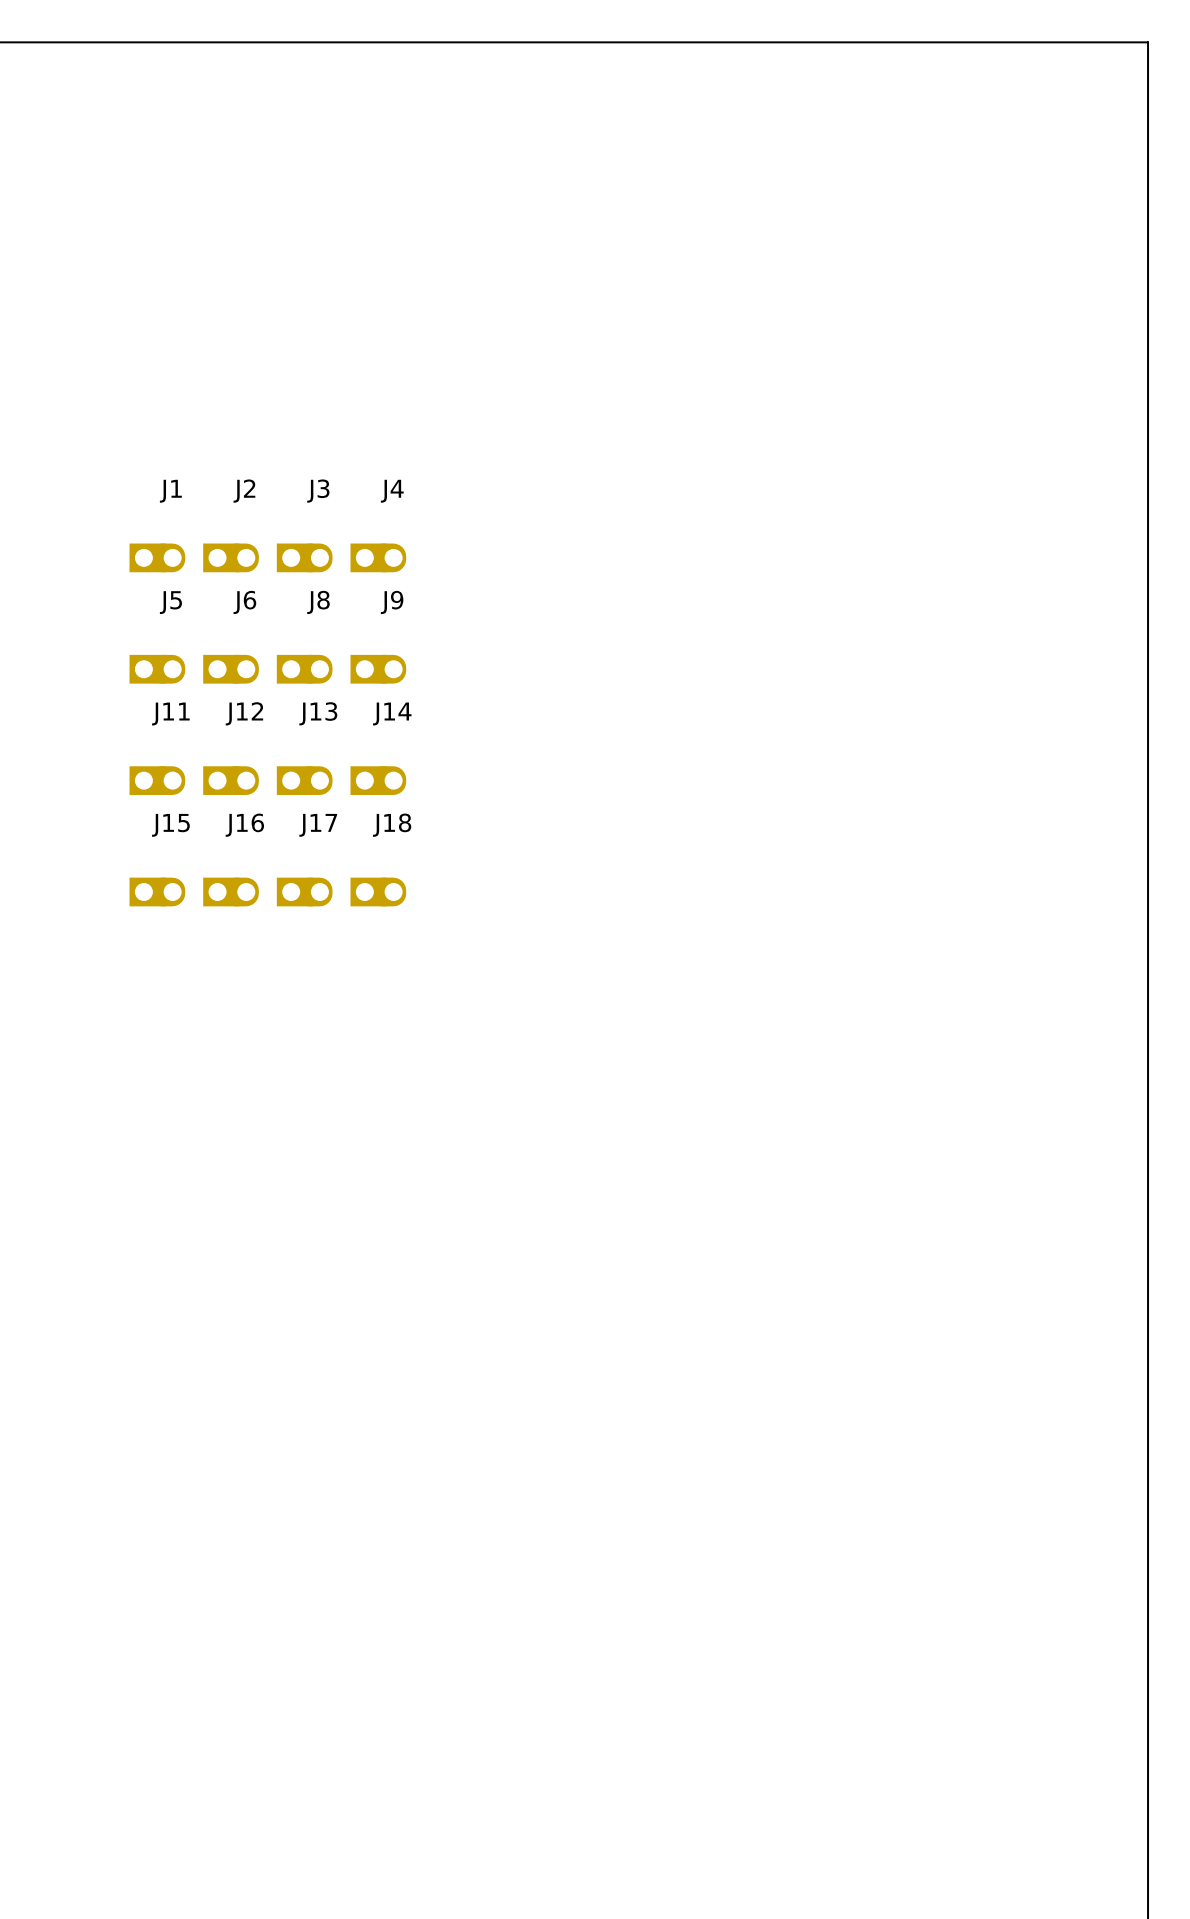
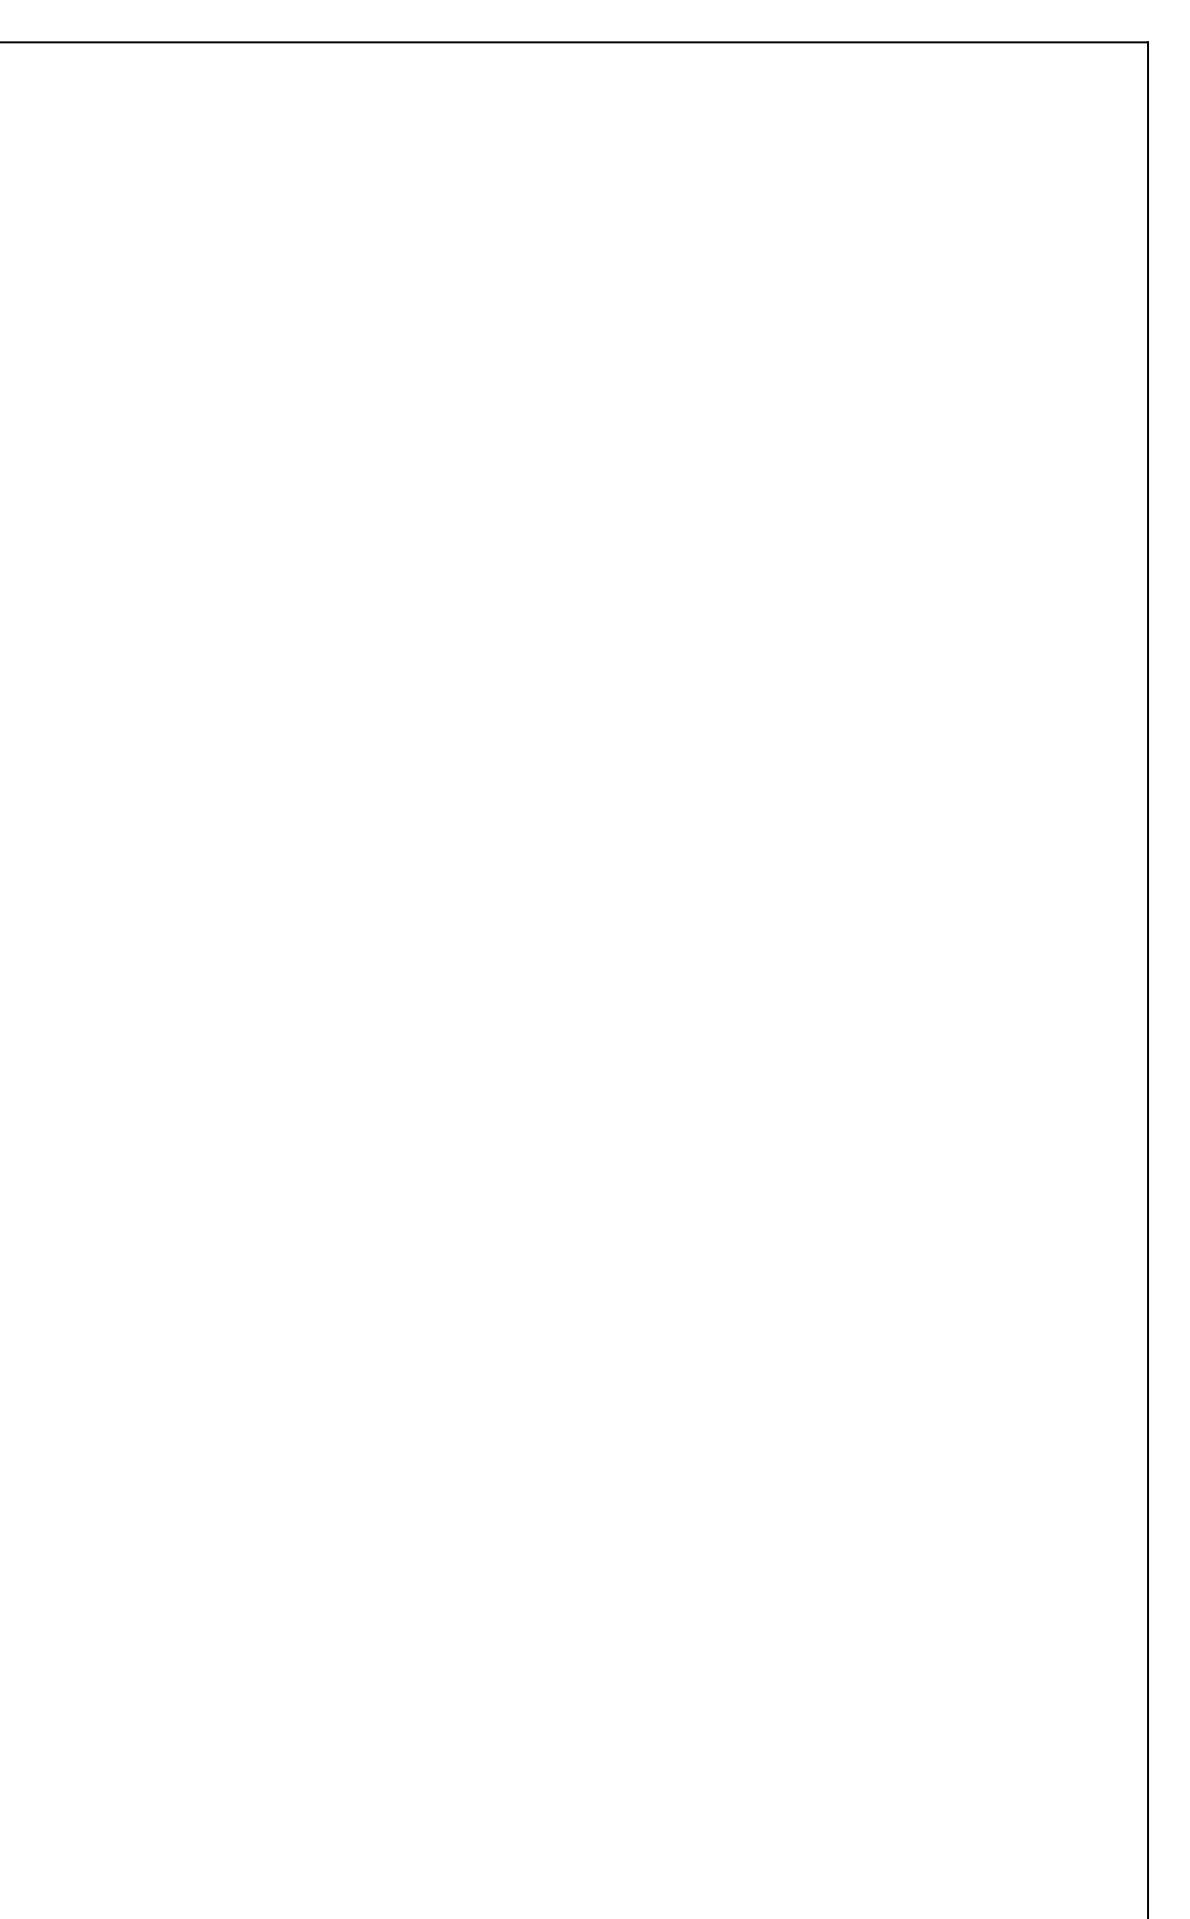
J1: (157, 557) -> none
J2: (231, 557) -> none
J3: (304, 557) -> none
J4: (378, 557) -> none
J5: (157, 669) -> none
J6: (231, 669) -> none
J8: (304, 669) -> none
J9: (378, 669) -> none
J11: (157, 780) -> none
J12: (231, 780) -> none
J13: (304, 780) -> none
J14: (378, 780) -> none
J15: (157, 892) -> none
J16: (231, 892) -> none
J17: (304, 892) -> none
J18: (378, 892) -> none

